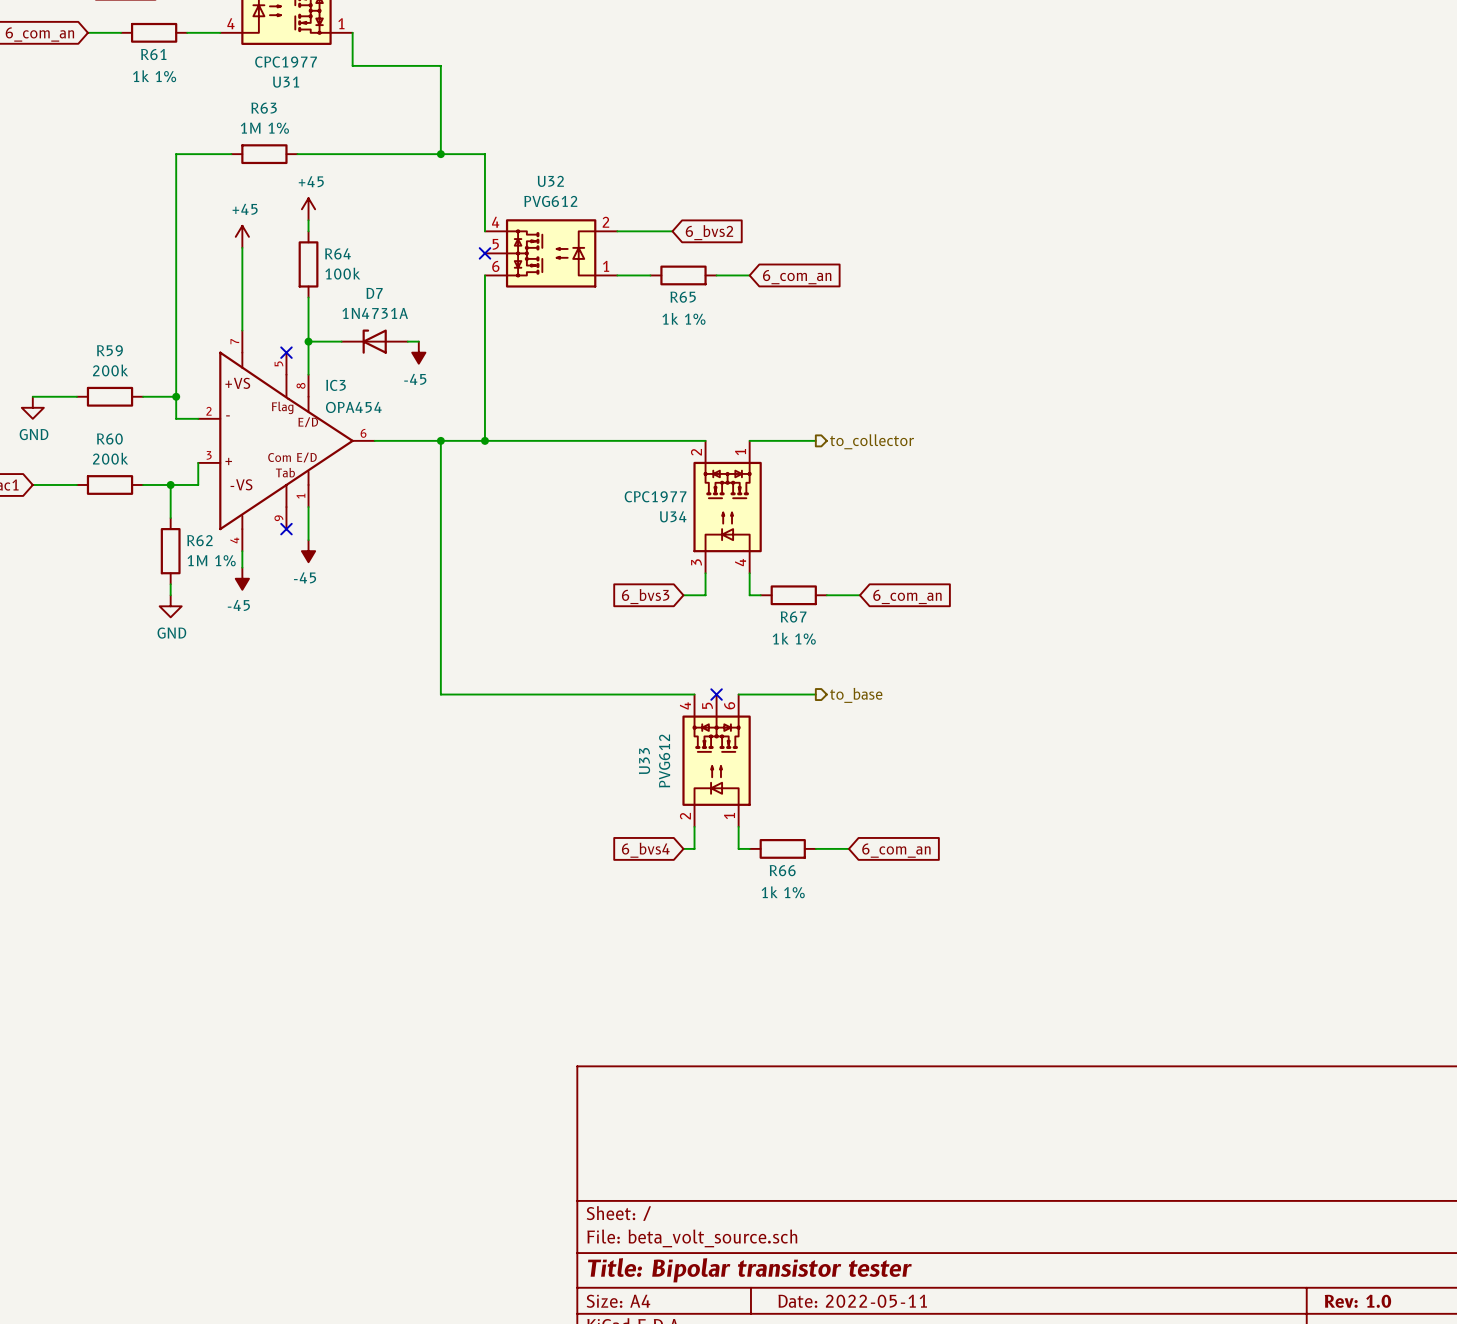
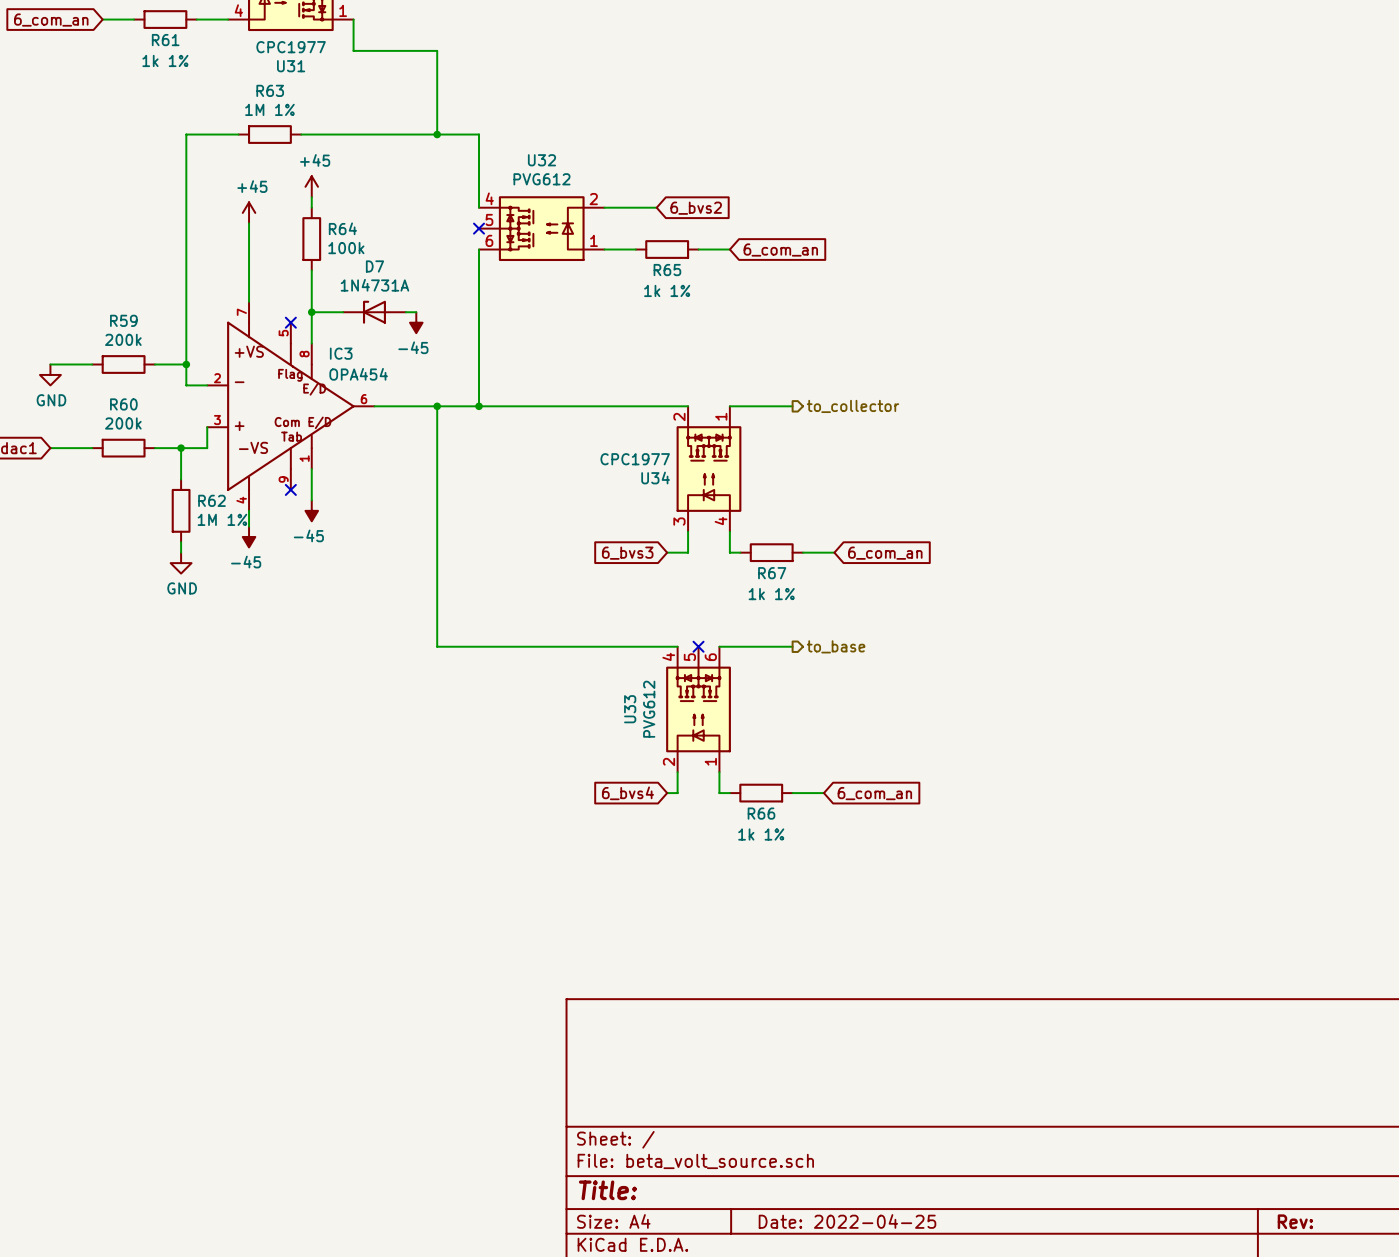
title block: Title: Bipolar transistor tester (749, 1270) -> Title: (607, 1190)
title block: Date: 2022-05-11 (852, 1301) -> Date: 2022-04-25 (847, 1221)
title block: Rev: 1.0 (1357, 1301) -> Rev: (1295, 1221)

